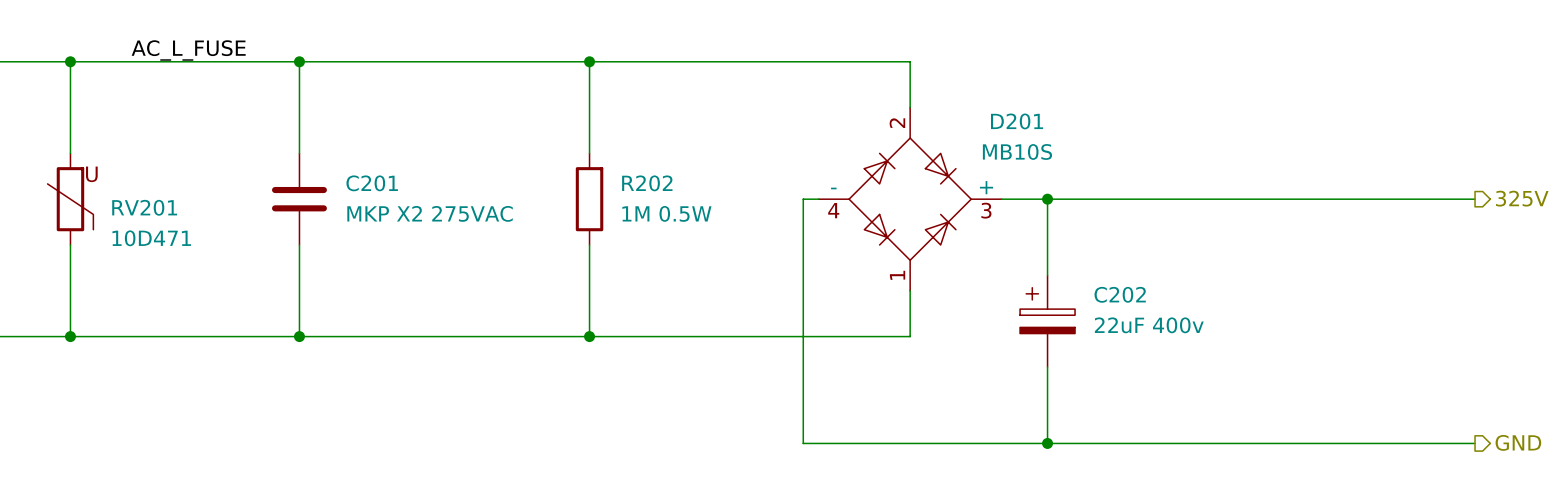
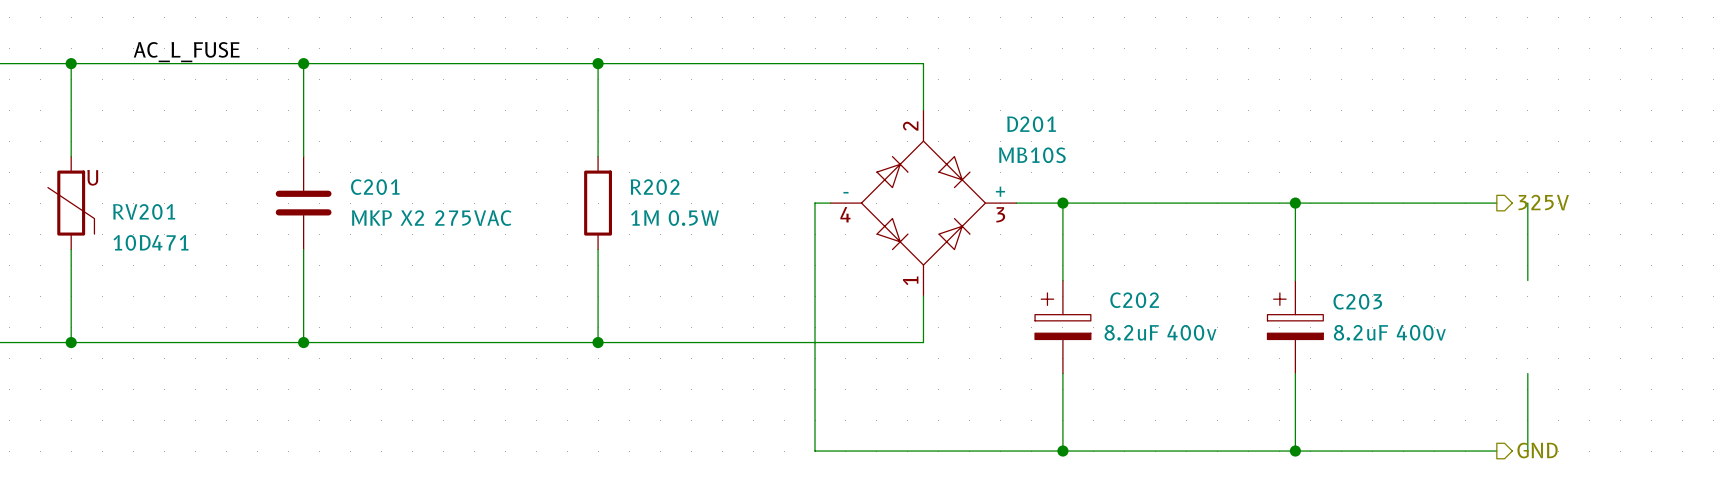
wire: none -> (1295, 203) (1295, 280)
junction: none -> (1295, 203)
wire: none -> (1527, 203) (1527, 280)
C203: none -> 8.2uF 400v (1295, 327)
C202 value: 22uF 400v (1149, 325) -> 8.2uF 400v (1160, 332)
wire: none -> (1295, 373) (1295, 451)
wire: none -> (1527, 373) (1527, 451)
junction: none -> (1295, 451)

